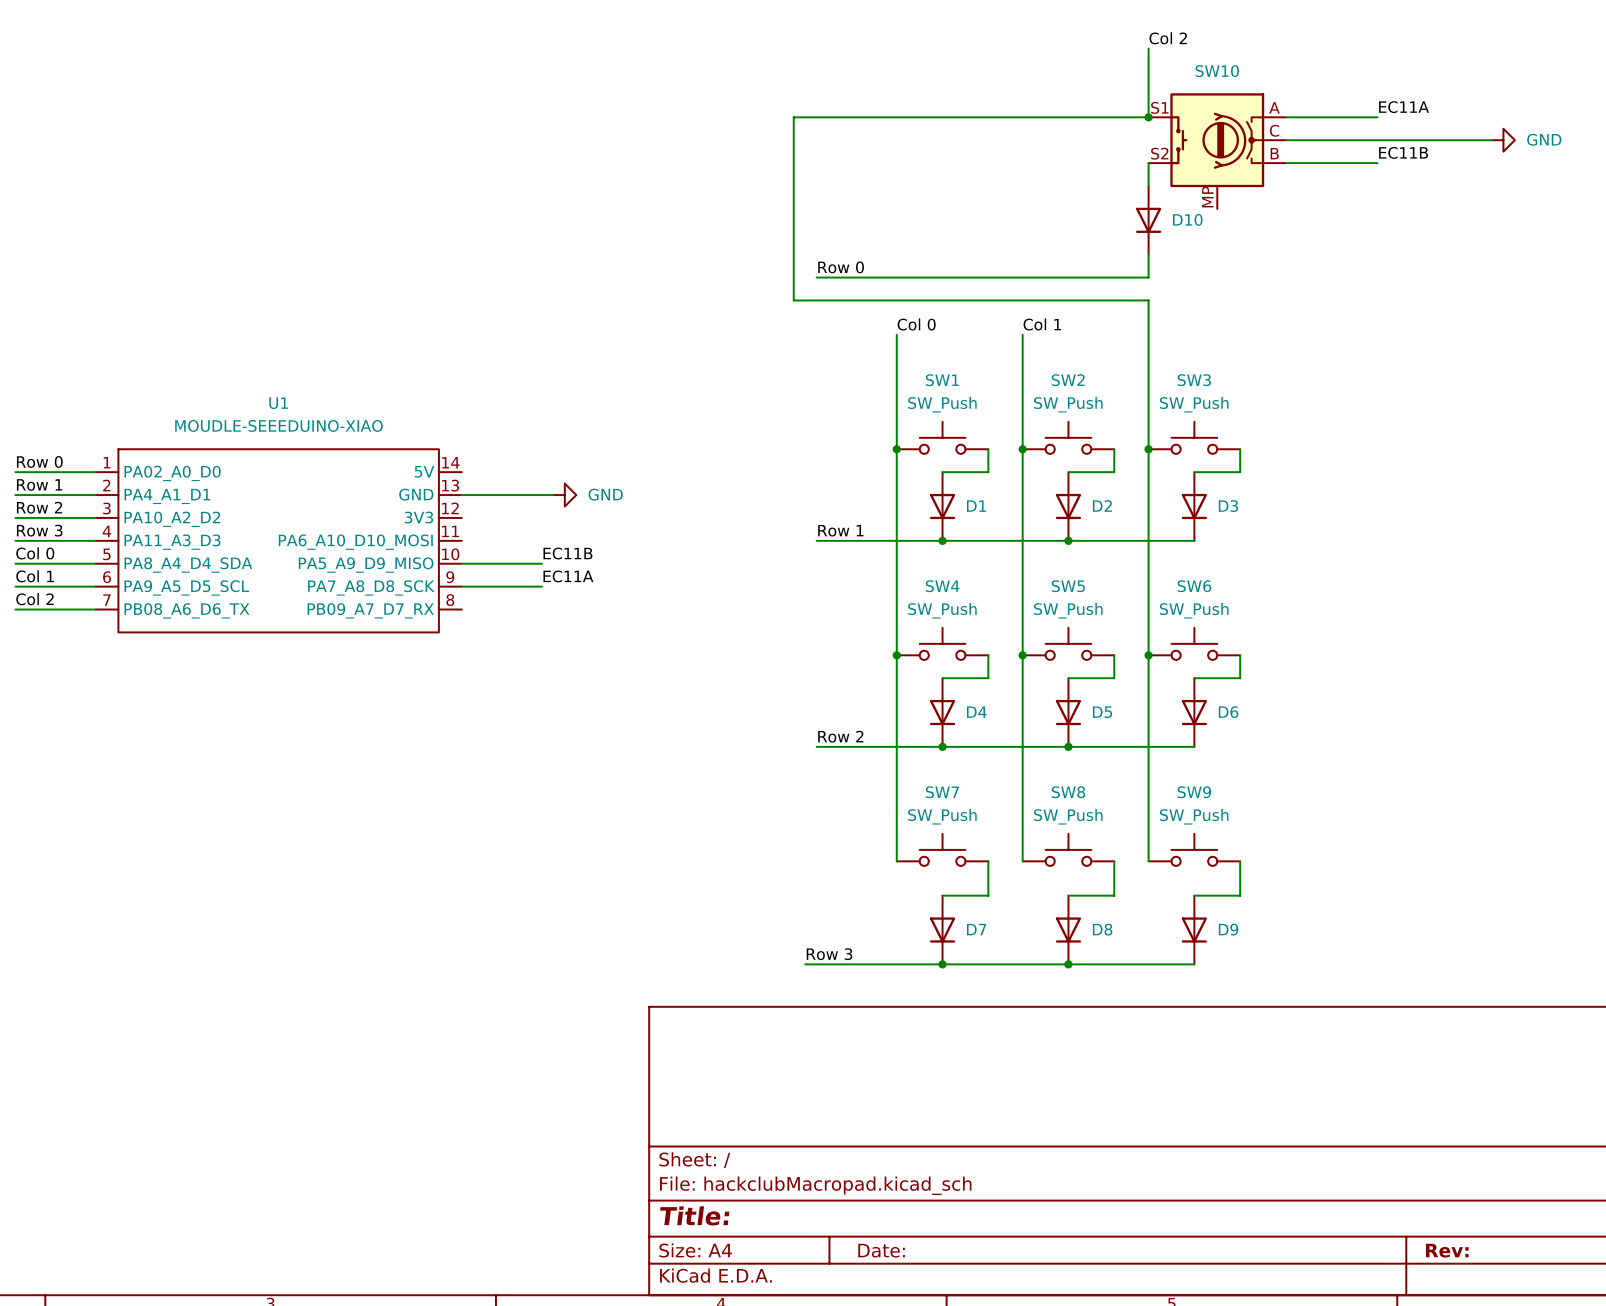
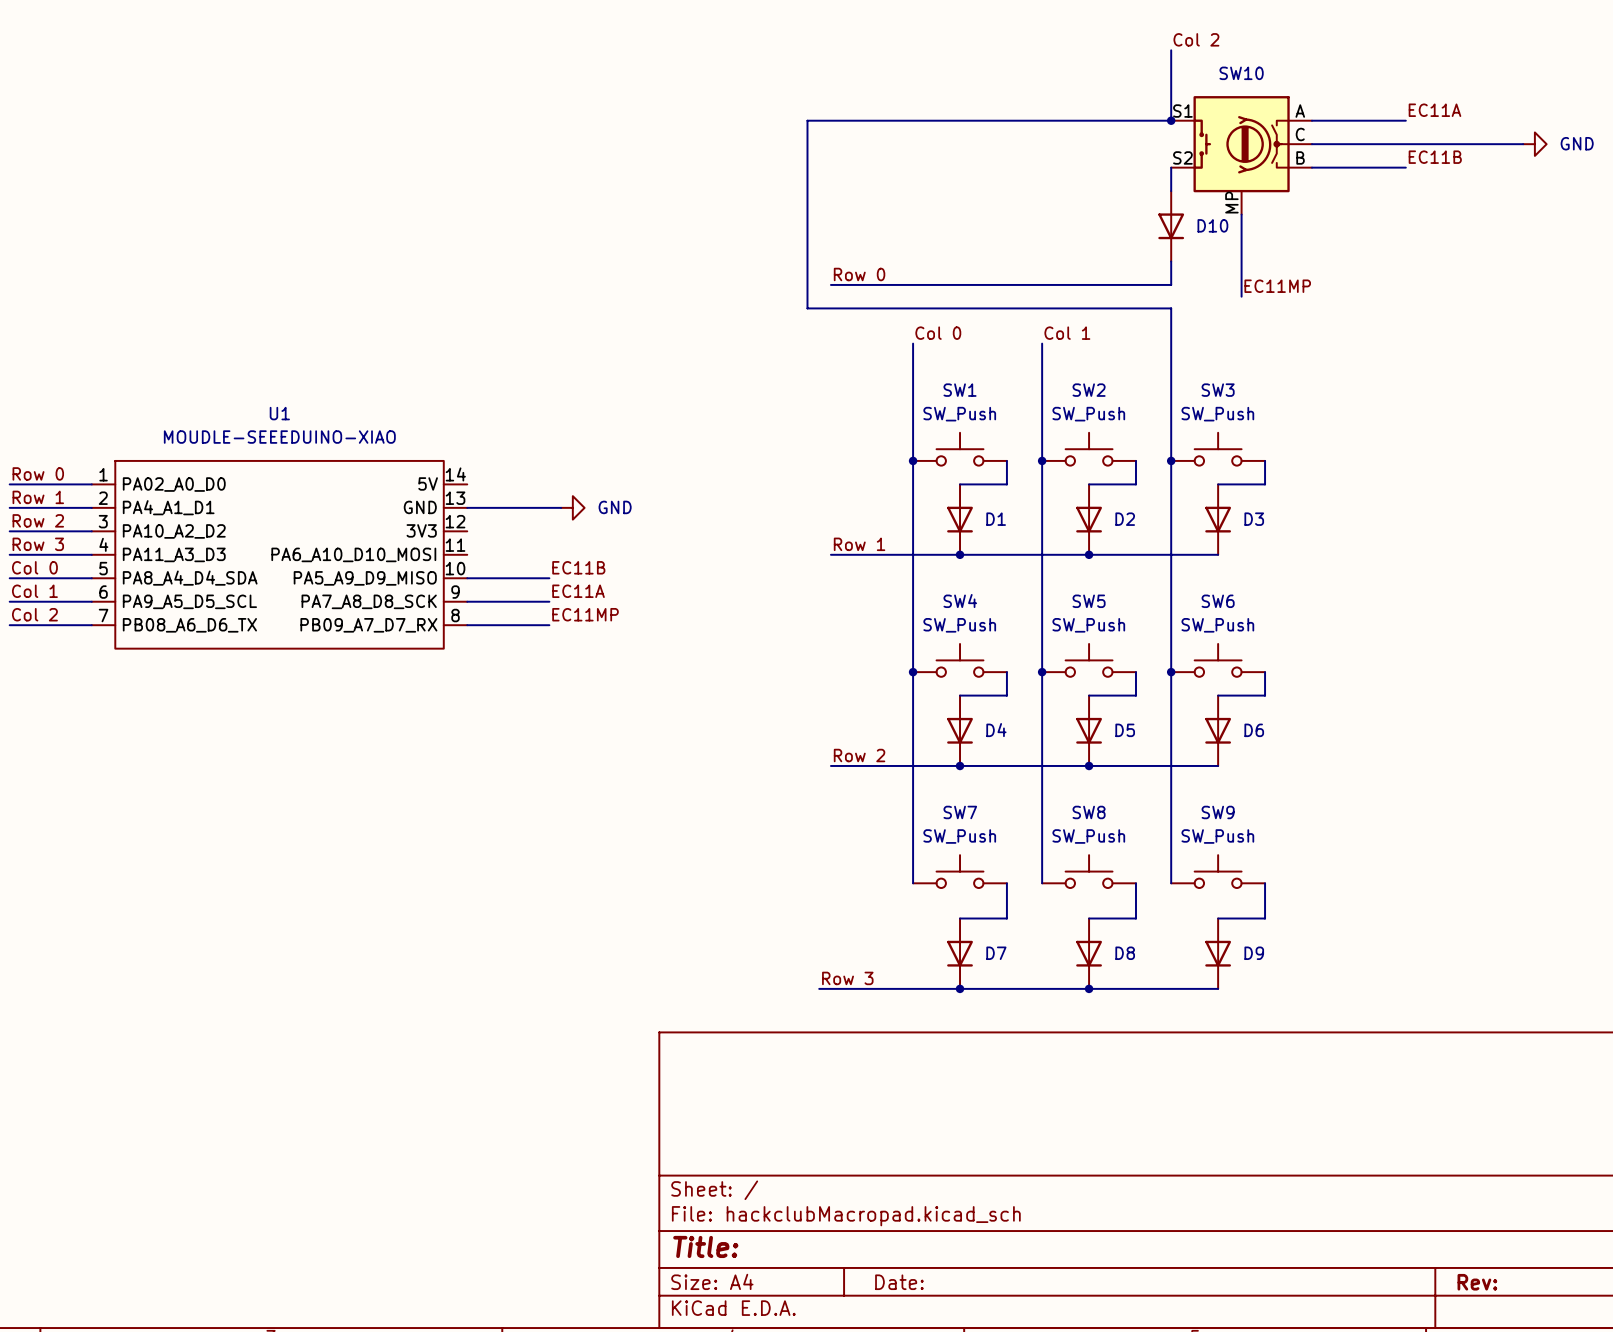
wire: none -> (1241, 214) (1241, 296)
label: none -> EC11MP (1277, 286)
label: none -> EC11MP (585, 614)
wire: none -> (467, 625) (549, 625)

